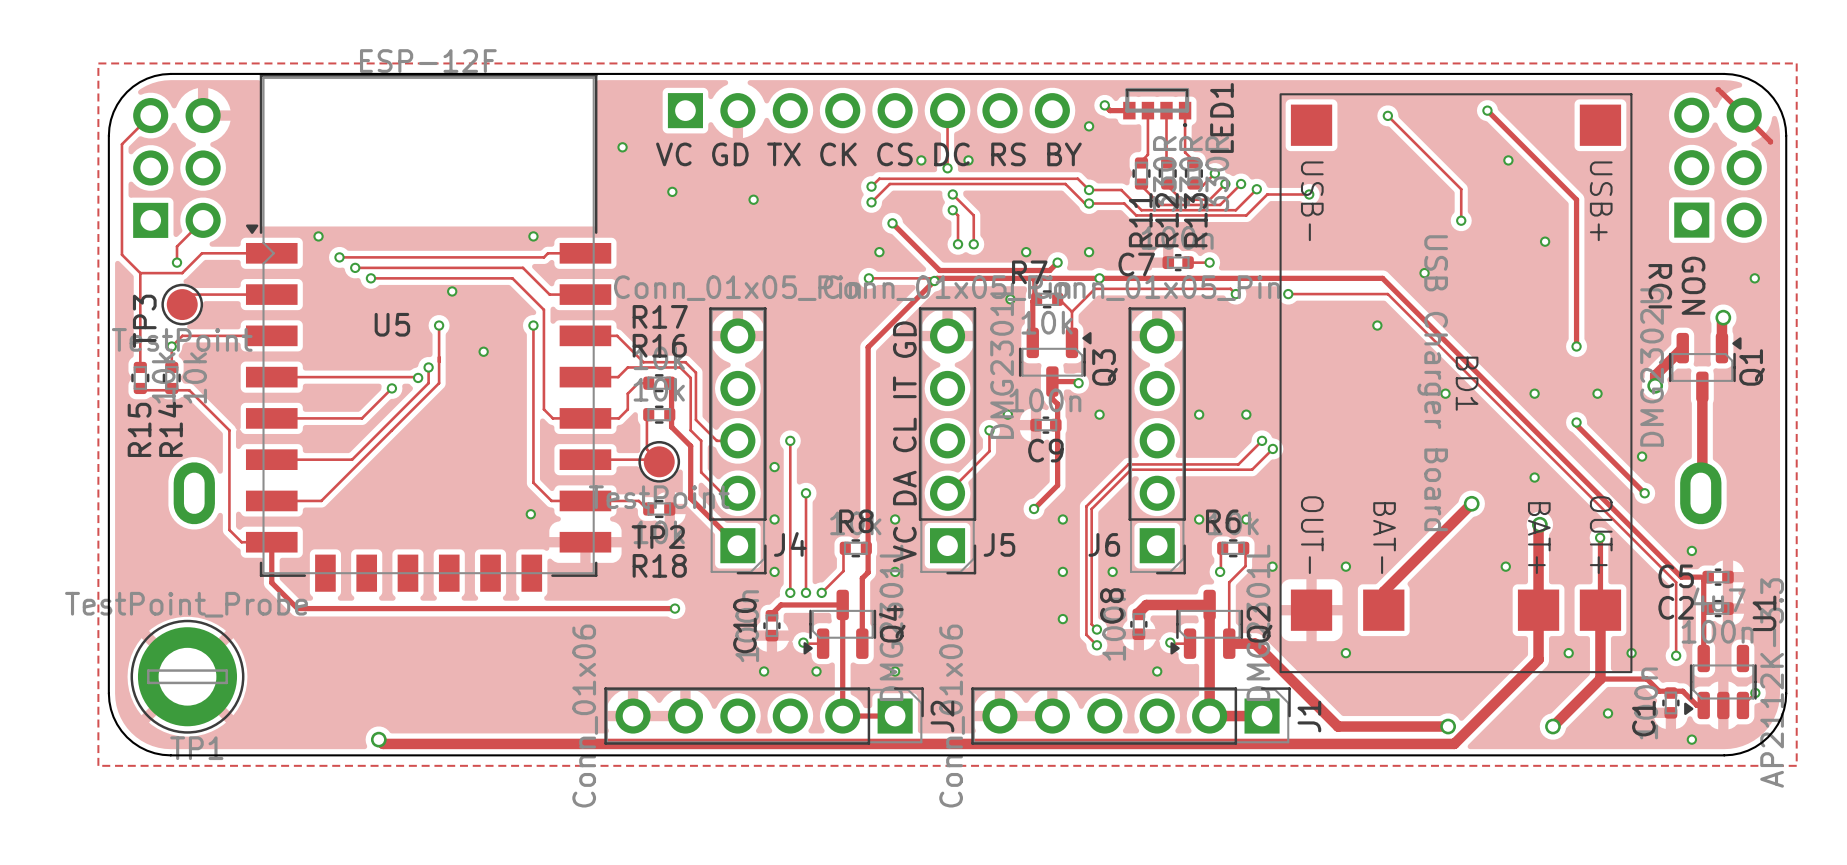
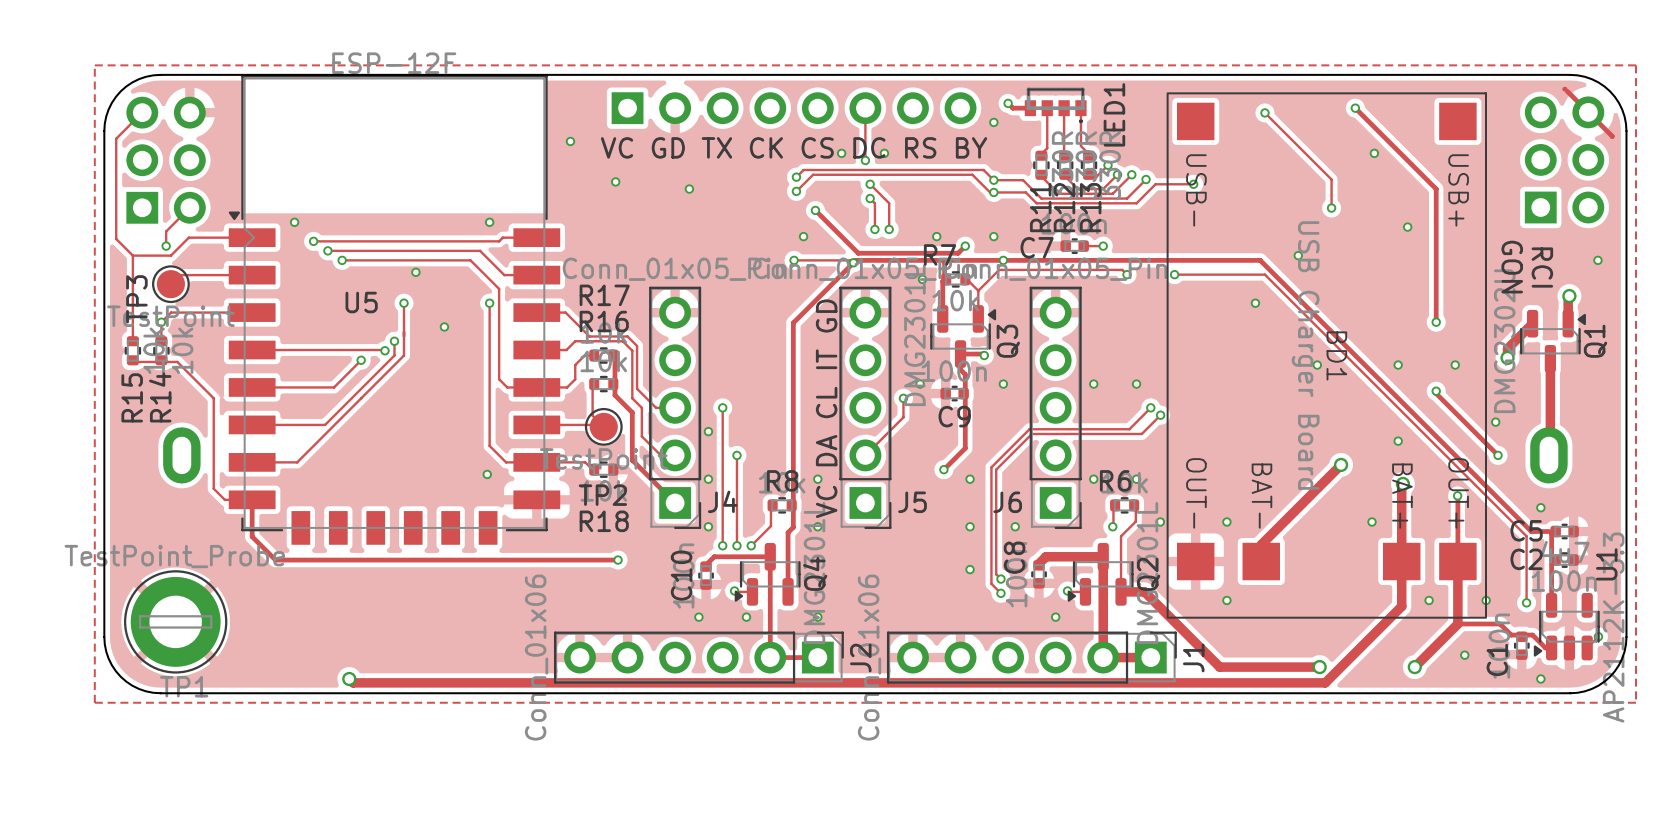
text: GON (1693, 285) -> RCI (1542, 267)
text: RCI (1660, 286) -> GON (1512, 267)

